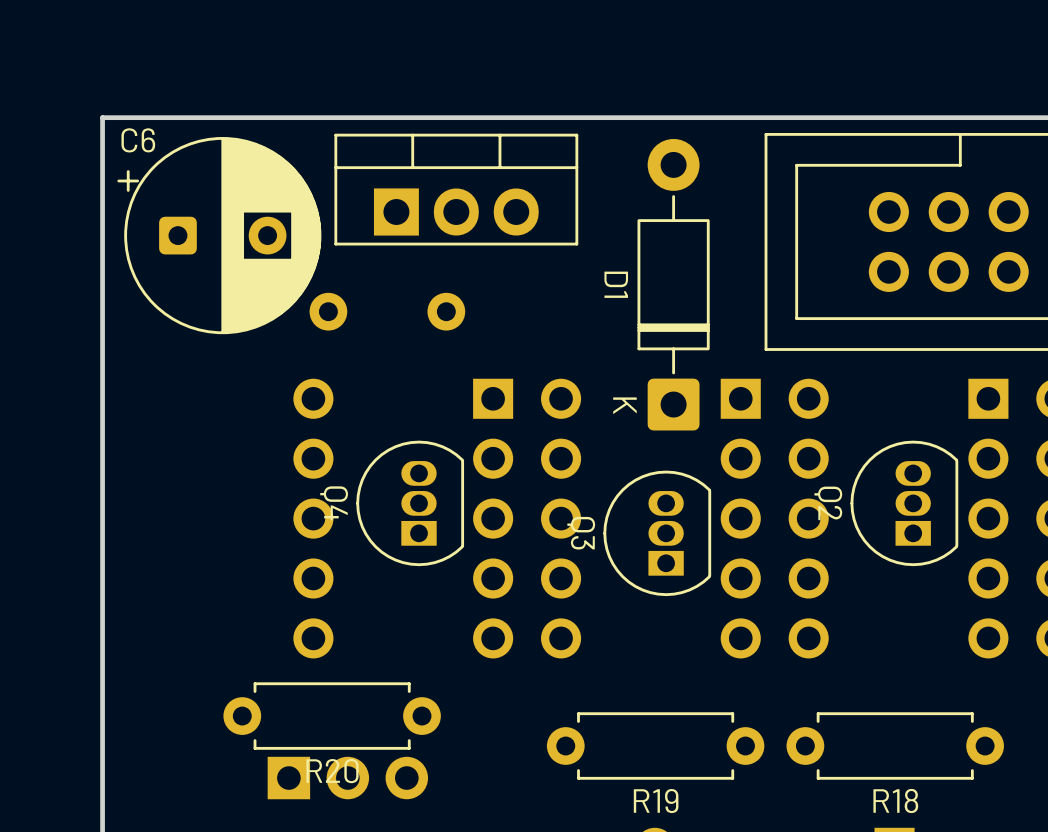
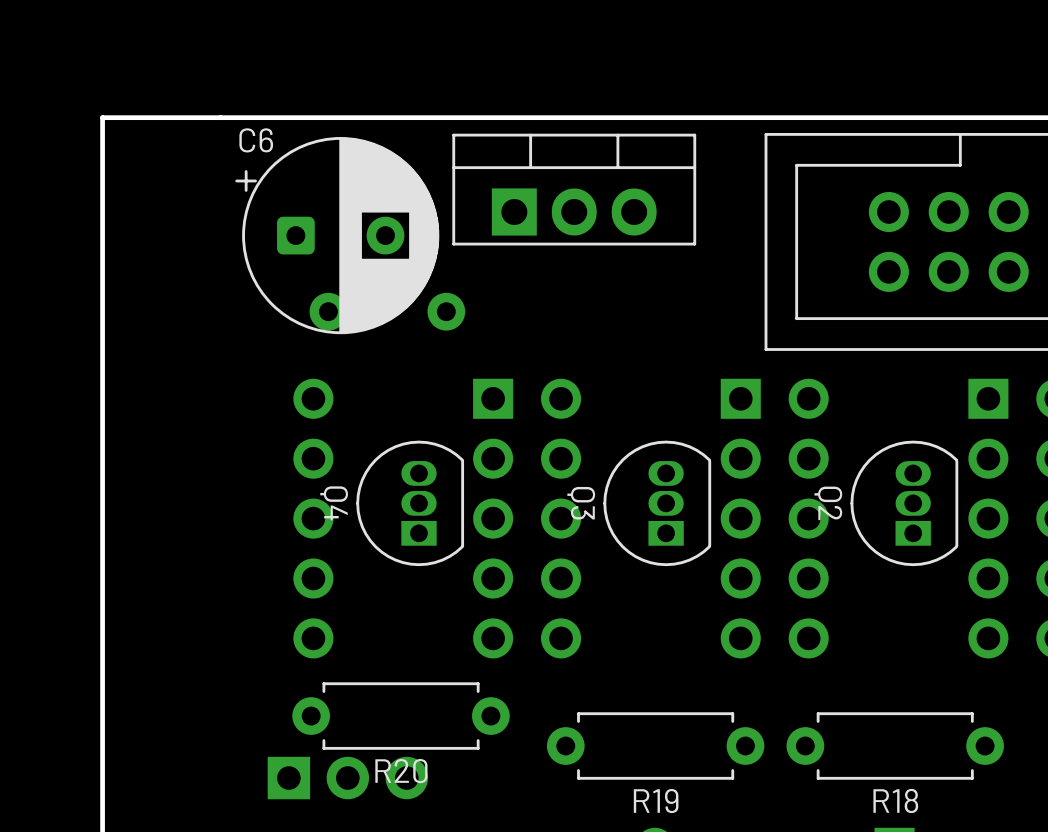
part position: (456, 189) -> (574, 189)
C6 position: (219, 235) -> (337, 235)
D1: (673, 284) -> none
Q3 position: (657, 533) -> (657, 503)
R20 position: (332, 716) -> (401, 716)

